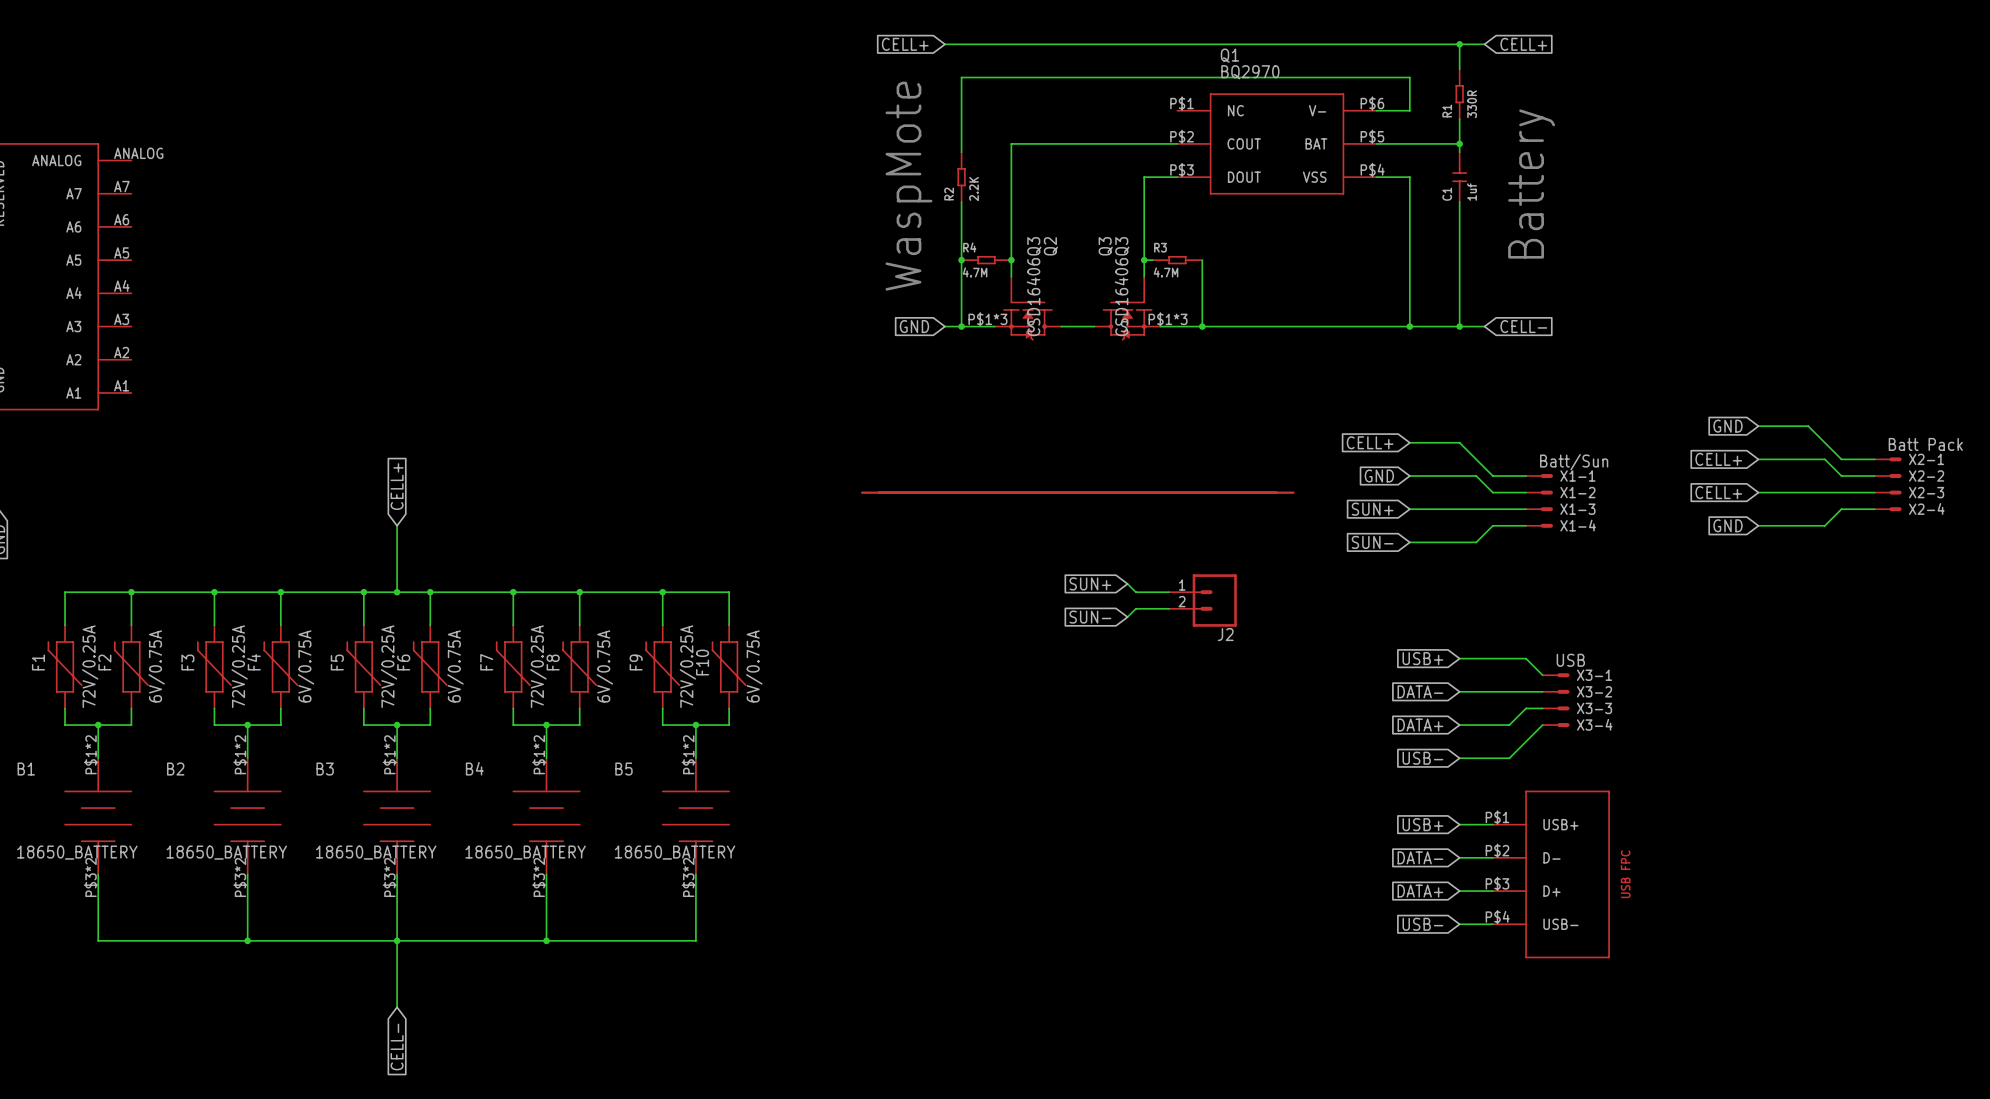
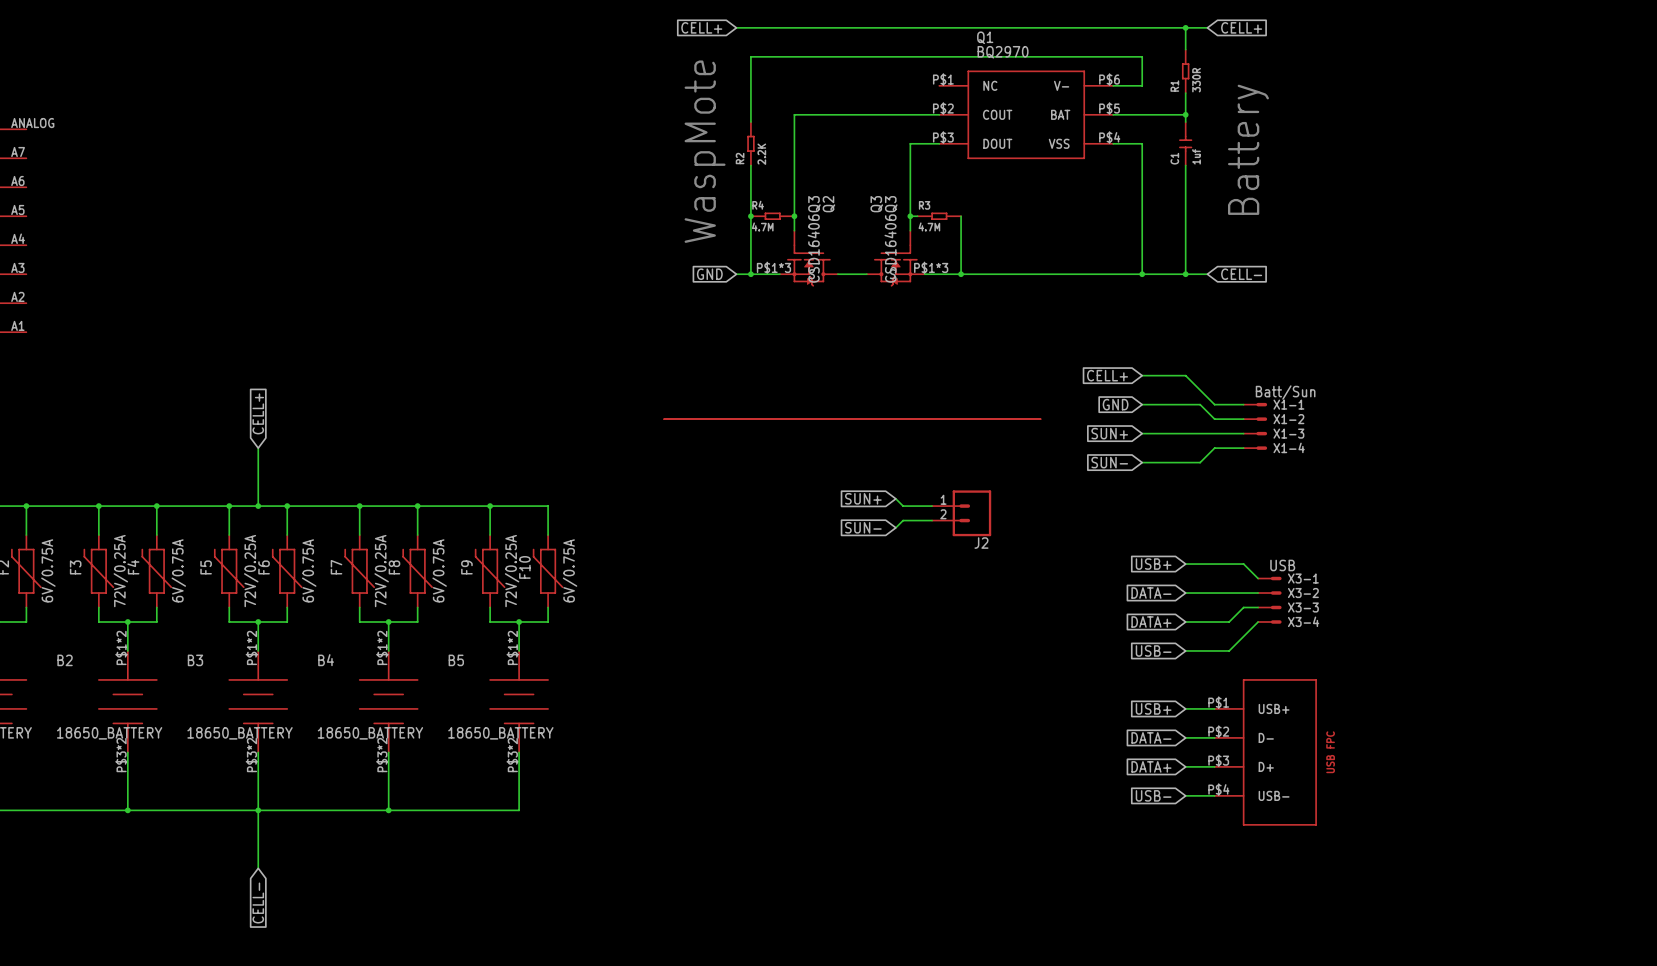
global label: GND (1727, 426) -> none
wire: (1758, 426) (1808, 426) (1841, 459) (1874, 459) -> none
global label: CELL+ (1718, 459) -> none
wire: (1758, 459) (1824, 459) (1841, 475) (1874, 475) -> none
X2-1: Batt Pack (1888, 459) -> none
X2-2: (1888, 475) -> none
global label: CELL+ (1718, 492) -> none
wire: (1758, 492) (1874, 492) -> none
X2-3: (1888, 492) -> none
wire: (1874, 509) (1841, 509) (1824, 525) (1758, 525) -> none
X2-4: (1888, 509) -> none
global label: GND (1727, 525) -> none

